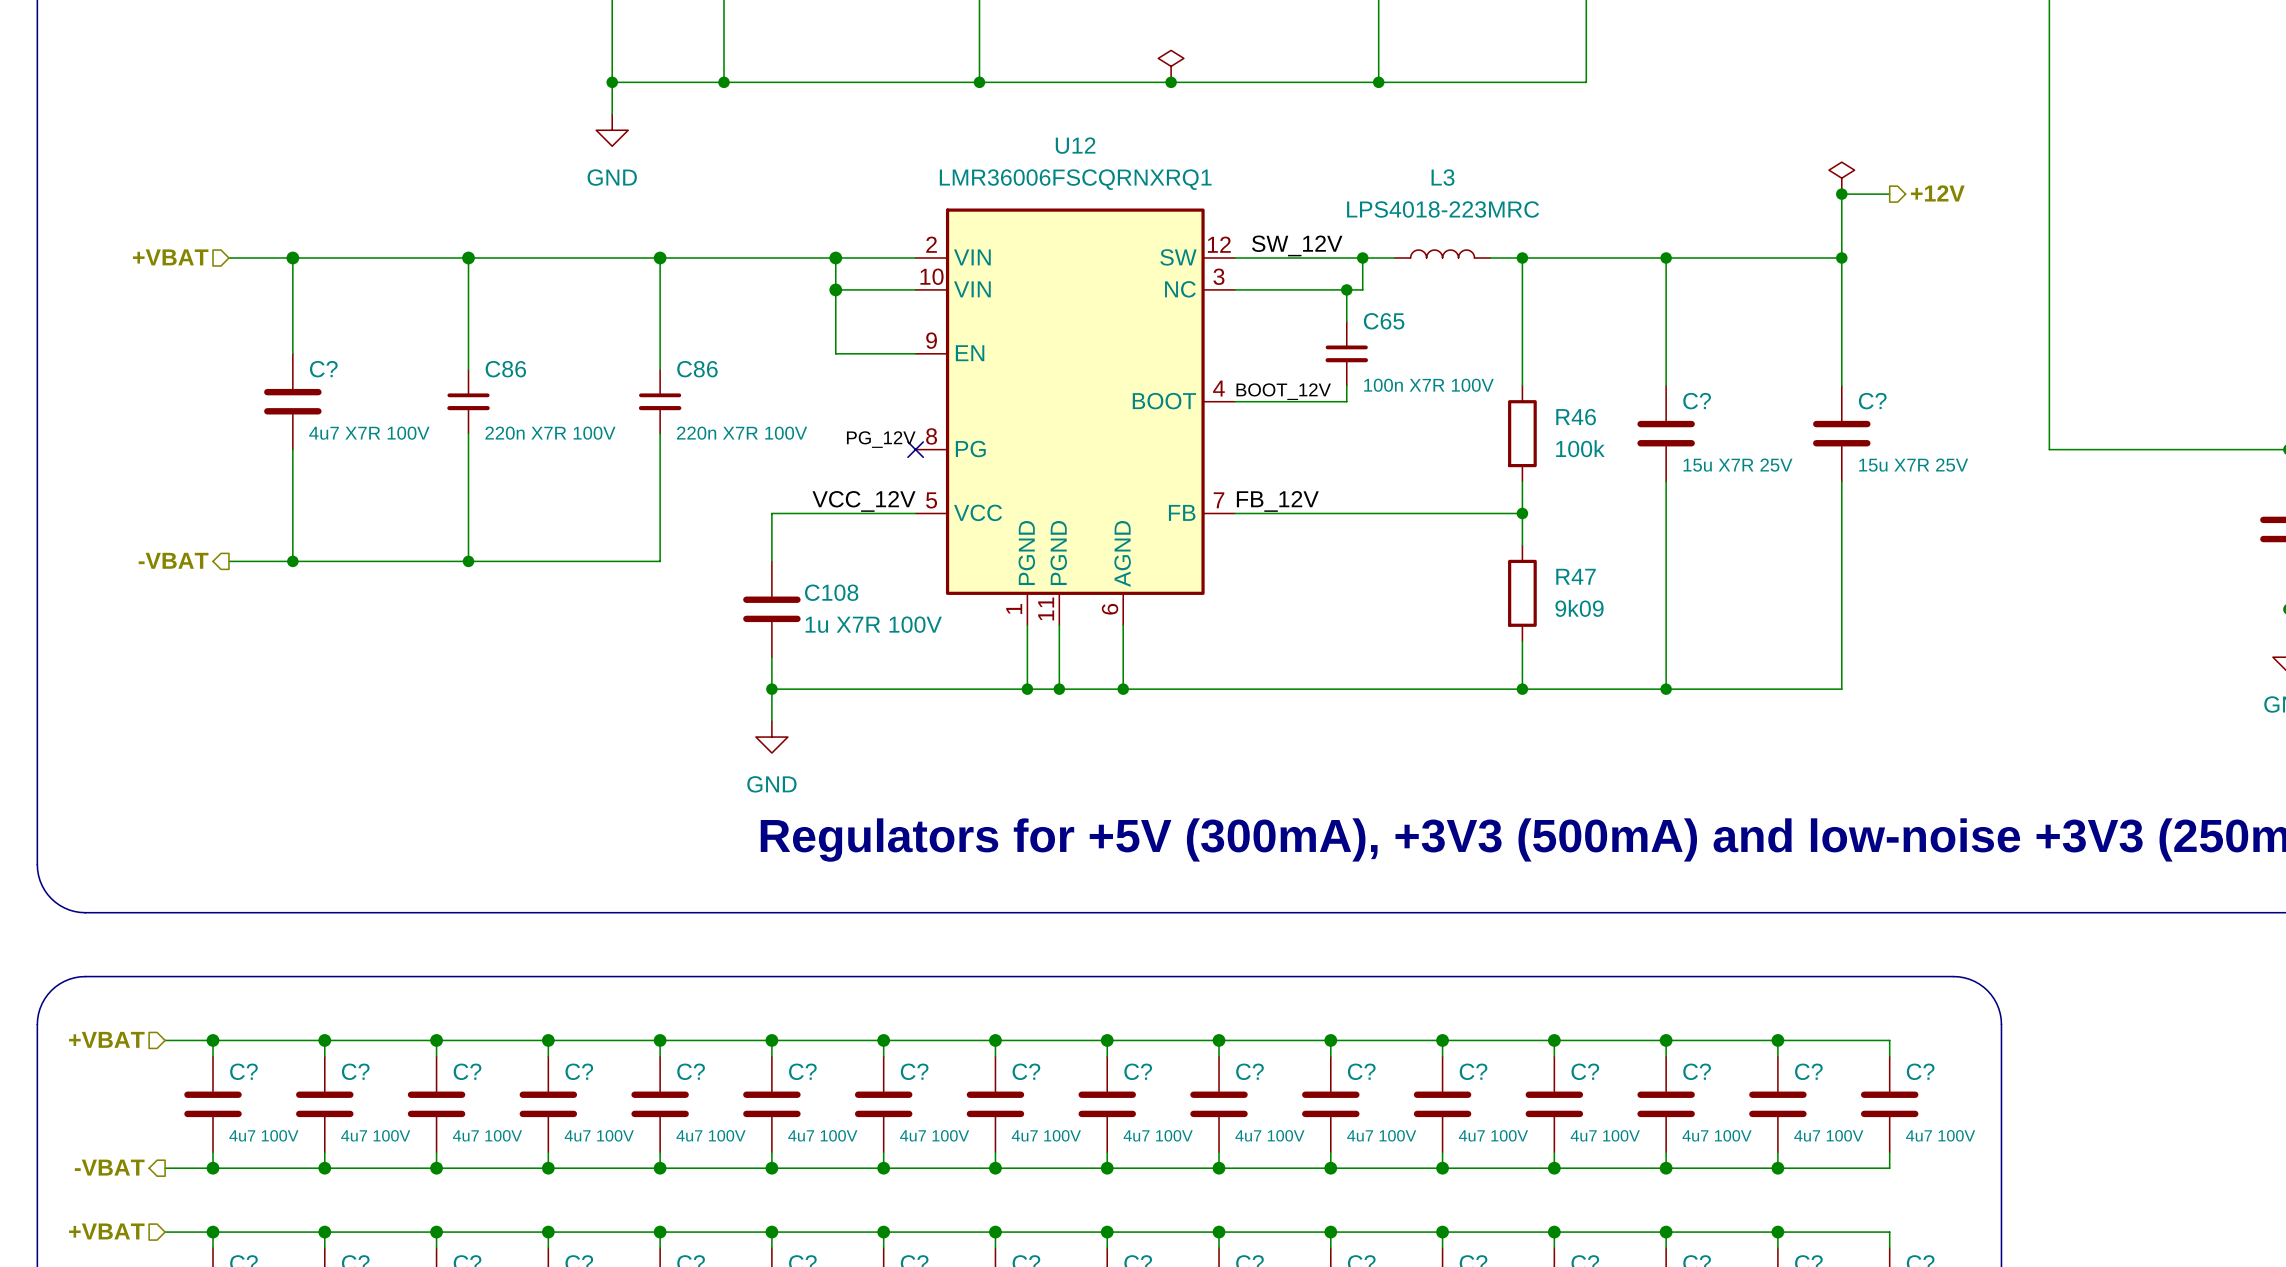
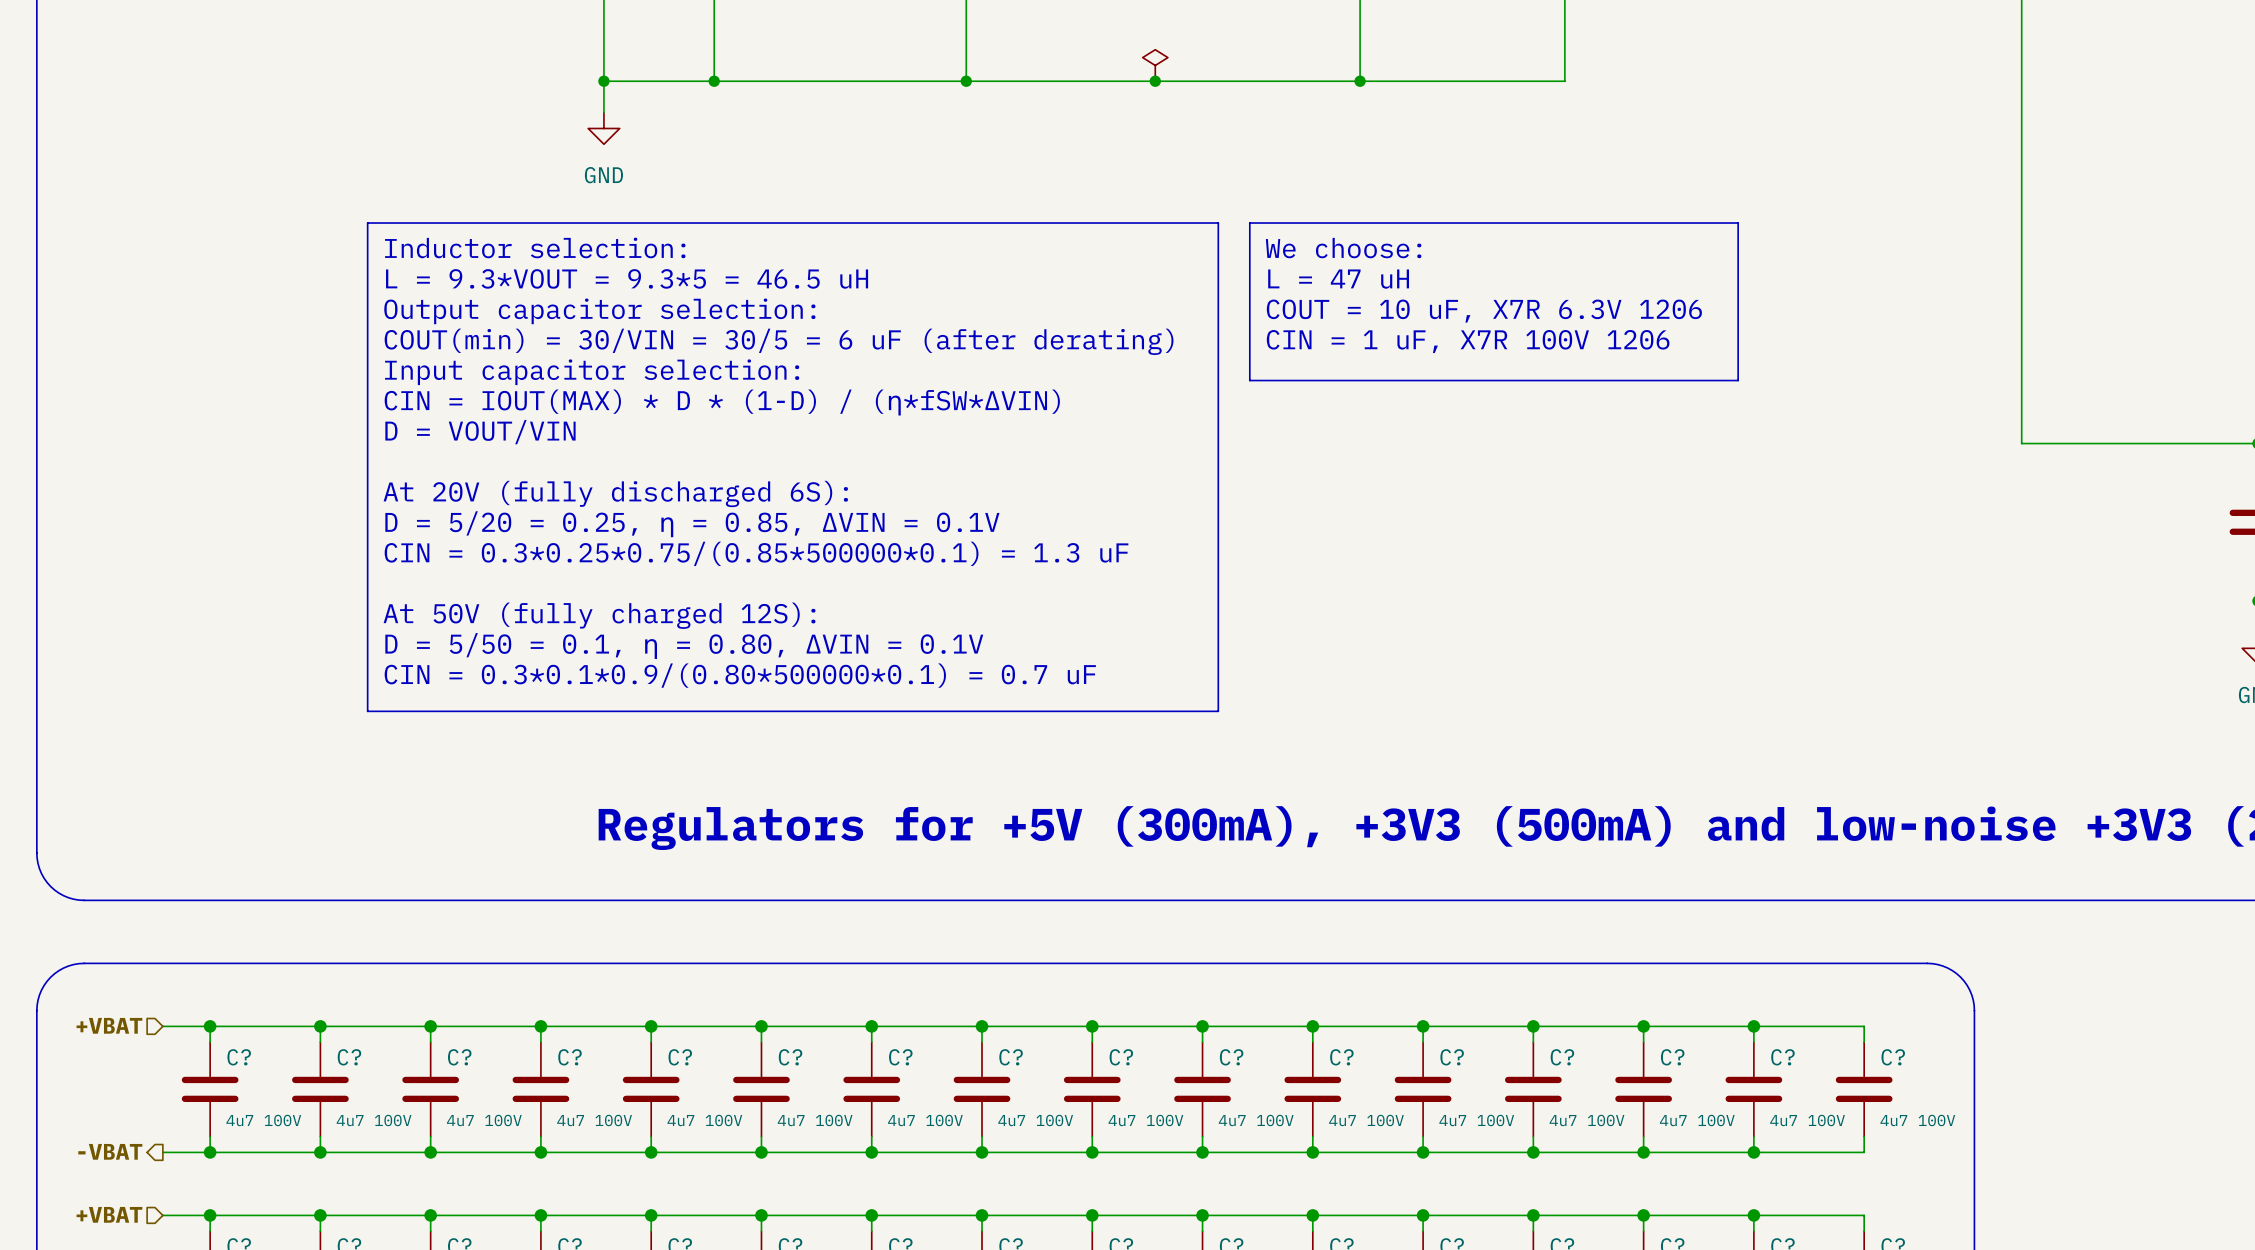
power symbol: (1841, 178) -> none
hierarchical label: +12V (1937, 193) -> none
junction: (1841, 194) -> none
wire: (1889, 194) (1841, 194) (1841, 385) -> none
line: none -> (367, 223) (1218, 223) (1218, 711) (367, 711) (367, 223)
line: none -> (1249, 223) (1738, 223) (1738, 380) (1249, 380) (1249, 223)
label: SW_12V (1297, 245) -> none
text: none -> Inductor selection: (535, 247)
text: none -> We choose: (1343, 248)
L3: LPS4018-223MRC (1442, 254) -> none
hierarchical label: +VBAT (170, 257) -> none
wire: (228, 258) (915, 258) -> none
wire: (292, 258) (292, 353) -> none
junction: (292, 258) -> none
wire: (468, 258) (468, 369) -> none
junction: (468, 258) -> none
wire: (660, 258) (660, 369) -> none
junction: (660, 258) -> none
wire: (835, 258) (835, 353) (915, 353) -> none
junction: (835, 258) -> none
wire: (1234, 258) (1394, 258) -> none
wire: (1362, 258) (1362, 289) (1234, 289) -> none
junction: (1362, 258) -> none
wire: (1490, 258) (1841, 258) -> none
wire: (1522, 258) (1522, 385) -> none
junction: (1522, 258) -> none
wire: (1666, 258) (1666, 385) -> none
junction: (1666, 258) -> none
junction: (1841, 258) -> none
text: none -> L = 9.3*VOUT = 9.3*5 = 46.5 uH (627, 278)
text: none -> L = 47 uH (1338, 279)
wire: (835, 289) (915, 289) -> none
junction: (835, 289) -> none
wire: (1346, 289) (1346, 321) -> none
junction: (1346, 289) -> none
text: none -> Output capacitor selection: (599, 311)
text: none -> COUT = 10 uF, X7R 6.3V 1206 (1484, 311)
text: none -> COUT(min) = 30/VIN = 30/5 = 6 uF (after derating) (779, 341)
text: none -> CIN = 1 uF, X7R 100V 1206 (1468, 341)
C65: 100n X7R 100V (1346, 353) -> none
text: none -> Input capacitor selection: (592, 372)
wire: (1346, 385) (1346, 401) (1234, 401) -> none
label: BOOT_12V (1283, 391) -> none
C?: 4u7 X7R 100V (292, 401) -> none
C86: 220n X7R 100V (468, 401) -> none
C86: 220n X7R 100V (660, 401) -> none
text: none -> CIN = IOUT(MAX) * D * (1-D) / (η*fSW*∆VIN) (722, 402)
U12: LMR36006FSCQRNXRQ1 (1075, 416) -> none
wire: (468, 433) (468, 561) -> none
wire: (660, 433) (660, 561) (228, 561) -> none
R46: 100k (1522, 433) -> none
C?: 15u X7R 25V (1666, 433) -> none
C?: 15u X7R 25V (1841, 433) -> none
text: none -> D = VOUT/VIN (480, 432)
label: PG_12V (881, 439) -> none
wire: (292, 449) (292, 561) -> none
no-connect mark: (915, 449) -> none
wire: (1522, 481) (1522, 545) -> none
wire: (1666, 481) (1666, 689) -> none
wire: (1841, 481) (1841, 689) (771, 689) -> none
text: none -> At 20V (fully discharged 6S): (615, 493)
label: VCC_12V (864, 501) -> none
label: FB_12V (1277, 501) -> none
wire: (915, 513) (771, 513) (771, 561) -> none
wire: (1234, 513) (1522, 513) -> none
junction: (1522, 513) -> none
text: none -> D = 5/20 = 0.25, η = 0.85, ∆VIN = 0.1V (692, 524)
hierarchical label: -VBAT (173, 560) -> none
junction: (292, 561) -> none
junction: (468, 561) -> none
text: none -> CIN = 0.3*0.25*0.75/(0.85*500000*0.1) = 1.3 uF (756, 553)
R47: 9k09 (1522, 593) -> none
C108: 1u X7R 100V (771, 609) -> none
text: none -> At 50V (fully charged 12S): (599, 615)
wire: (1027, 625) (1027, 689) -> none
wire: (1059, 625) (1059, 689) -> none
wire: (1123, 625) (1123, 689) -> none
wire: (1522, 641) (1522, 689) -> none
text: none -> D = 5/50 = 0.1, η = 0.80, ∆VIN = 0.1V (684, 645)
wire: (771, 657) (771, 721) -> none
text: none -> CIN = 0.3*0.1*0.9/(0.80*500000*0.1) = 0.7 uF (740, 675)
junction: (771, 689) -> none
junction: (1027, 689) -> none
junction: (1059, 689) -> none
junction: (1123, 689) -> none
junction: (1522, 689) -> none
junction: (1666, 689) -> none
power symbol: GND (771, 737) -> none

